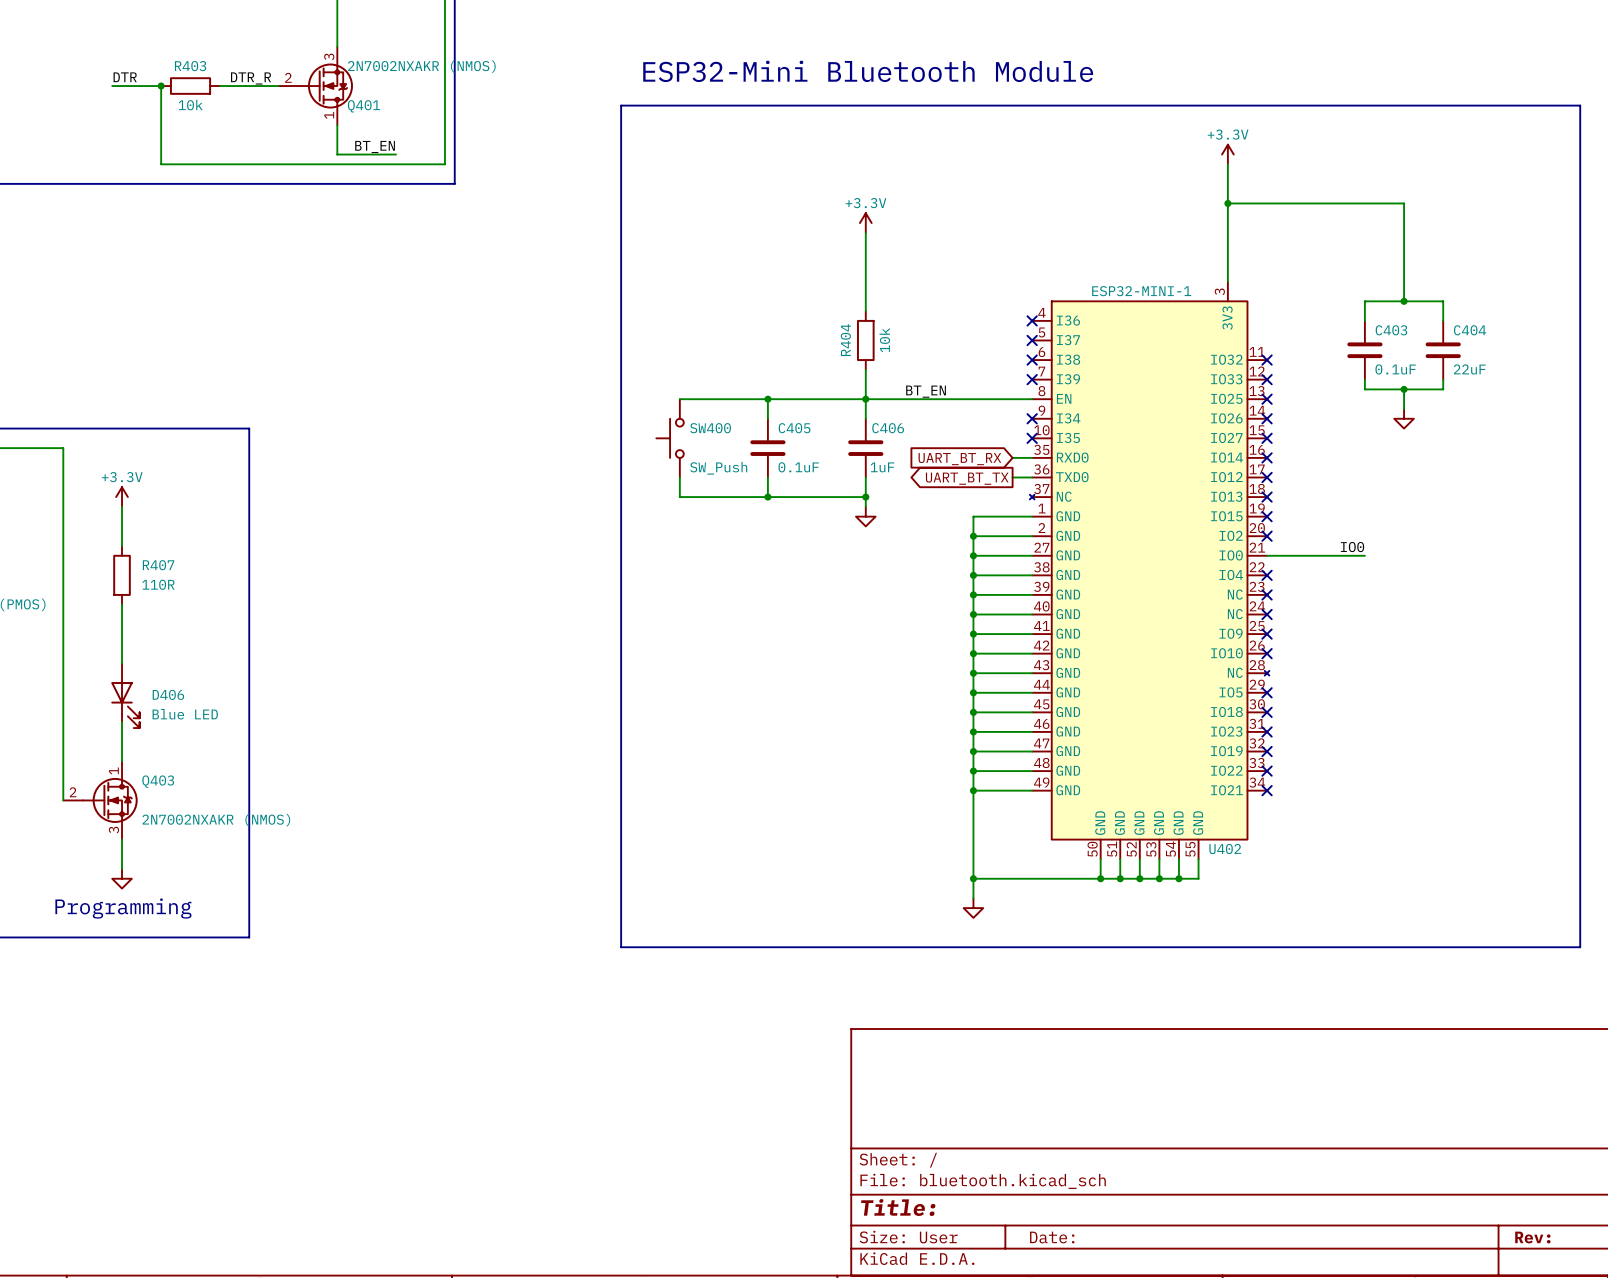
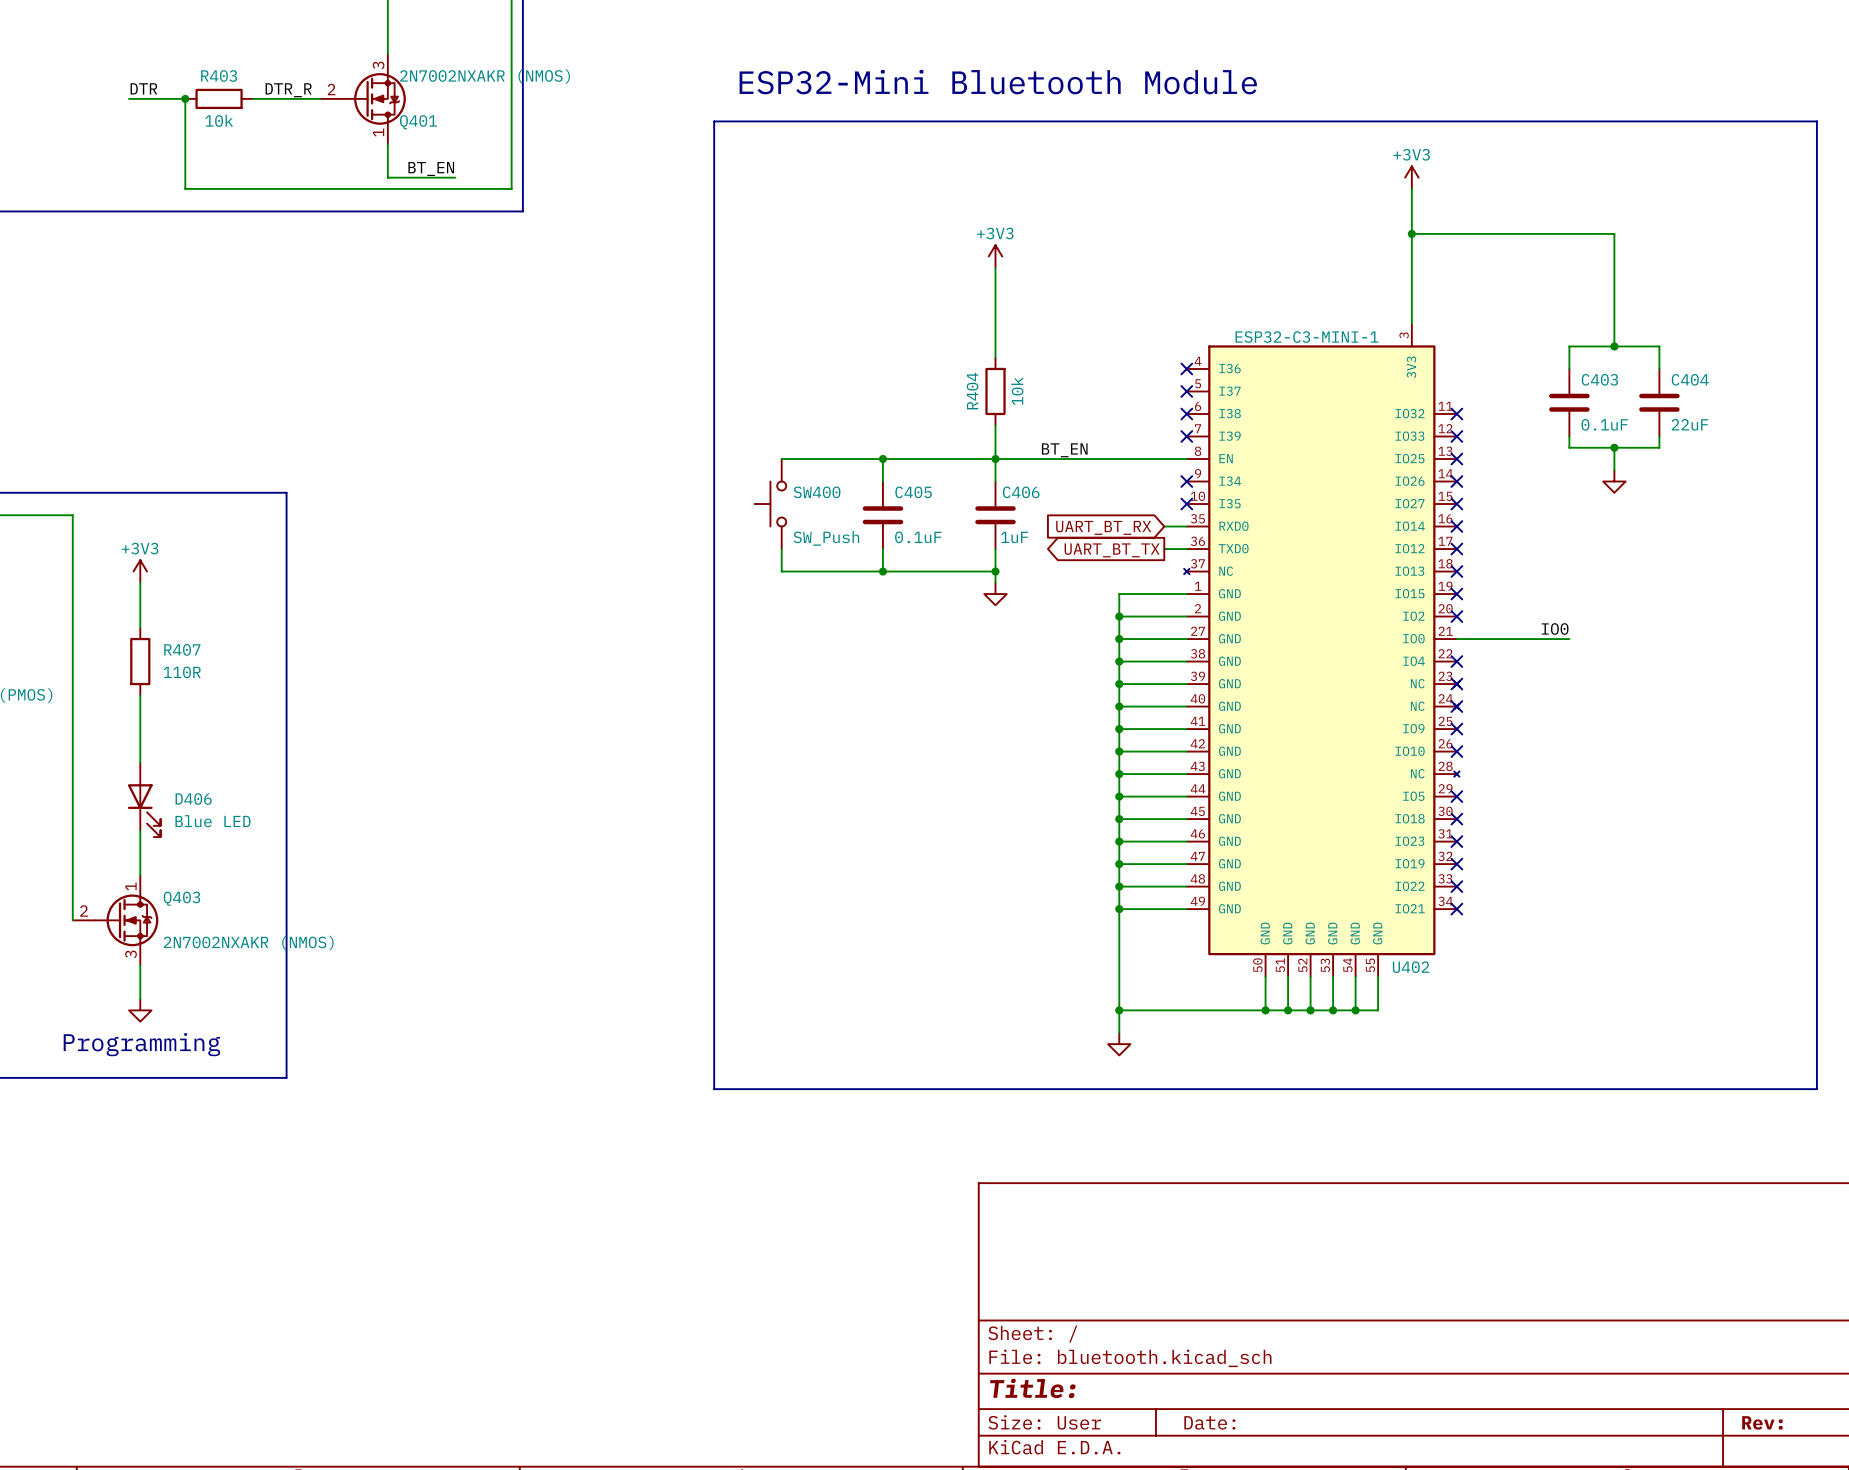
power symbol: +3.3V (1227, 154) -> +3V3 (1411, 177)
power symbol: +3.3V (865, 223) -> +3V3 (995, 256)
U402 symbol: [1029, 281, 1270, 860] -> [1184, 323, 1460, 977]
U402 value: ESP32-MINI-1 (1141, 291) -> ESP32-C3-MINI-1 (1306, 337)
power symbol: +3.3V (122, 497) -> +3V3 (140, 571)

